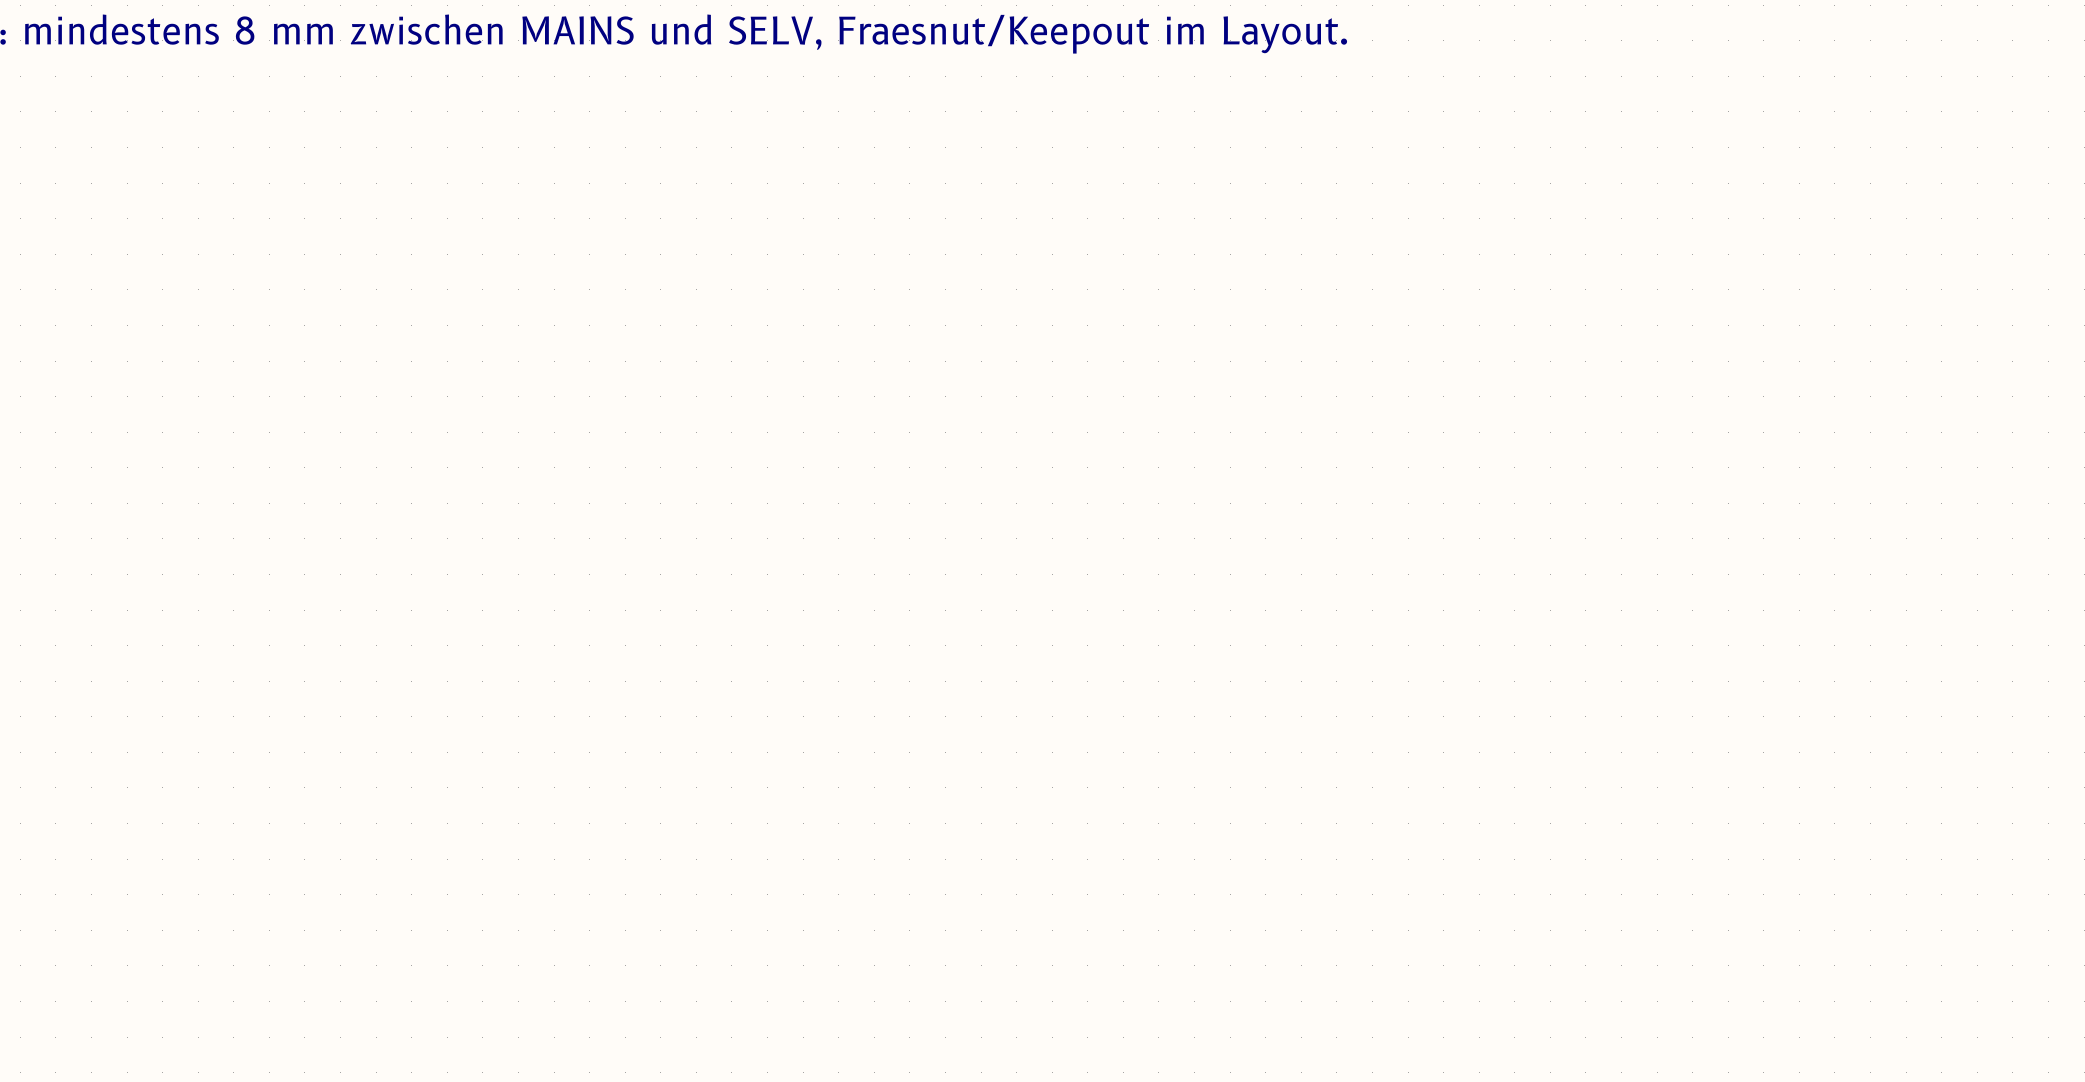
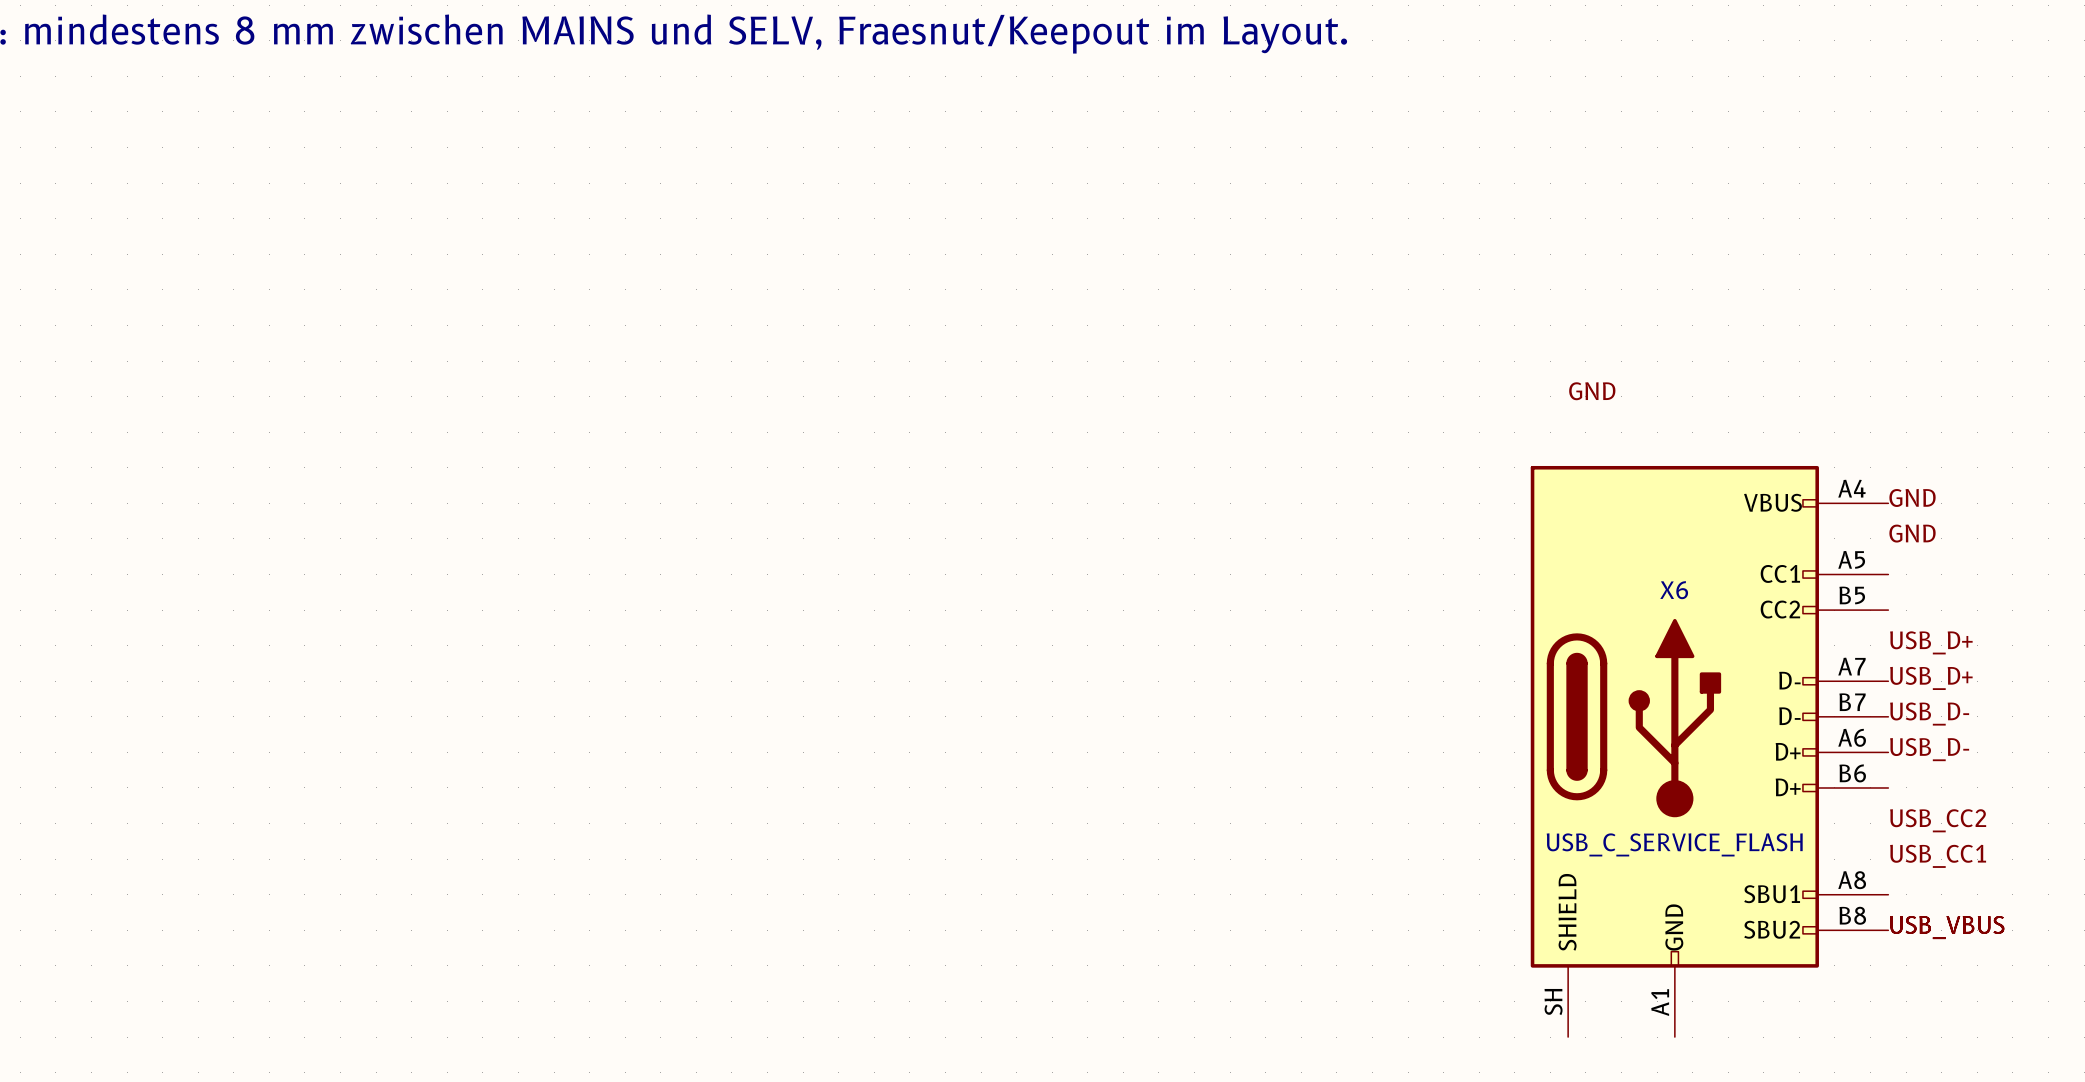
label: none -> GND (1592, 391)
label: none -> GND (1912, 497)
label: none -> GND (1912, 533)
label: none -> USB_D+ (1931, 642)
label: none -> USB_D+ (1931, 678)
label: none -> USB_D- (1929, 714)
label: none -> USB_D- (1929, 749)
X6: none -> USB_C_SERVICE_FLASH (1709, 751)
label: none -> USB_CC2 (1938, 820)
label: none -> USB_CC1 (1938, 856)
label: none -> USB_VBUS (1947, 927)

